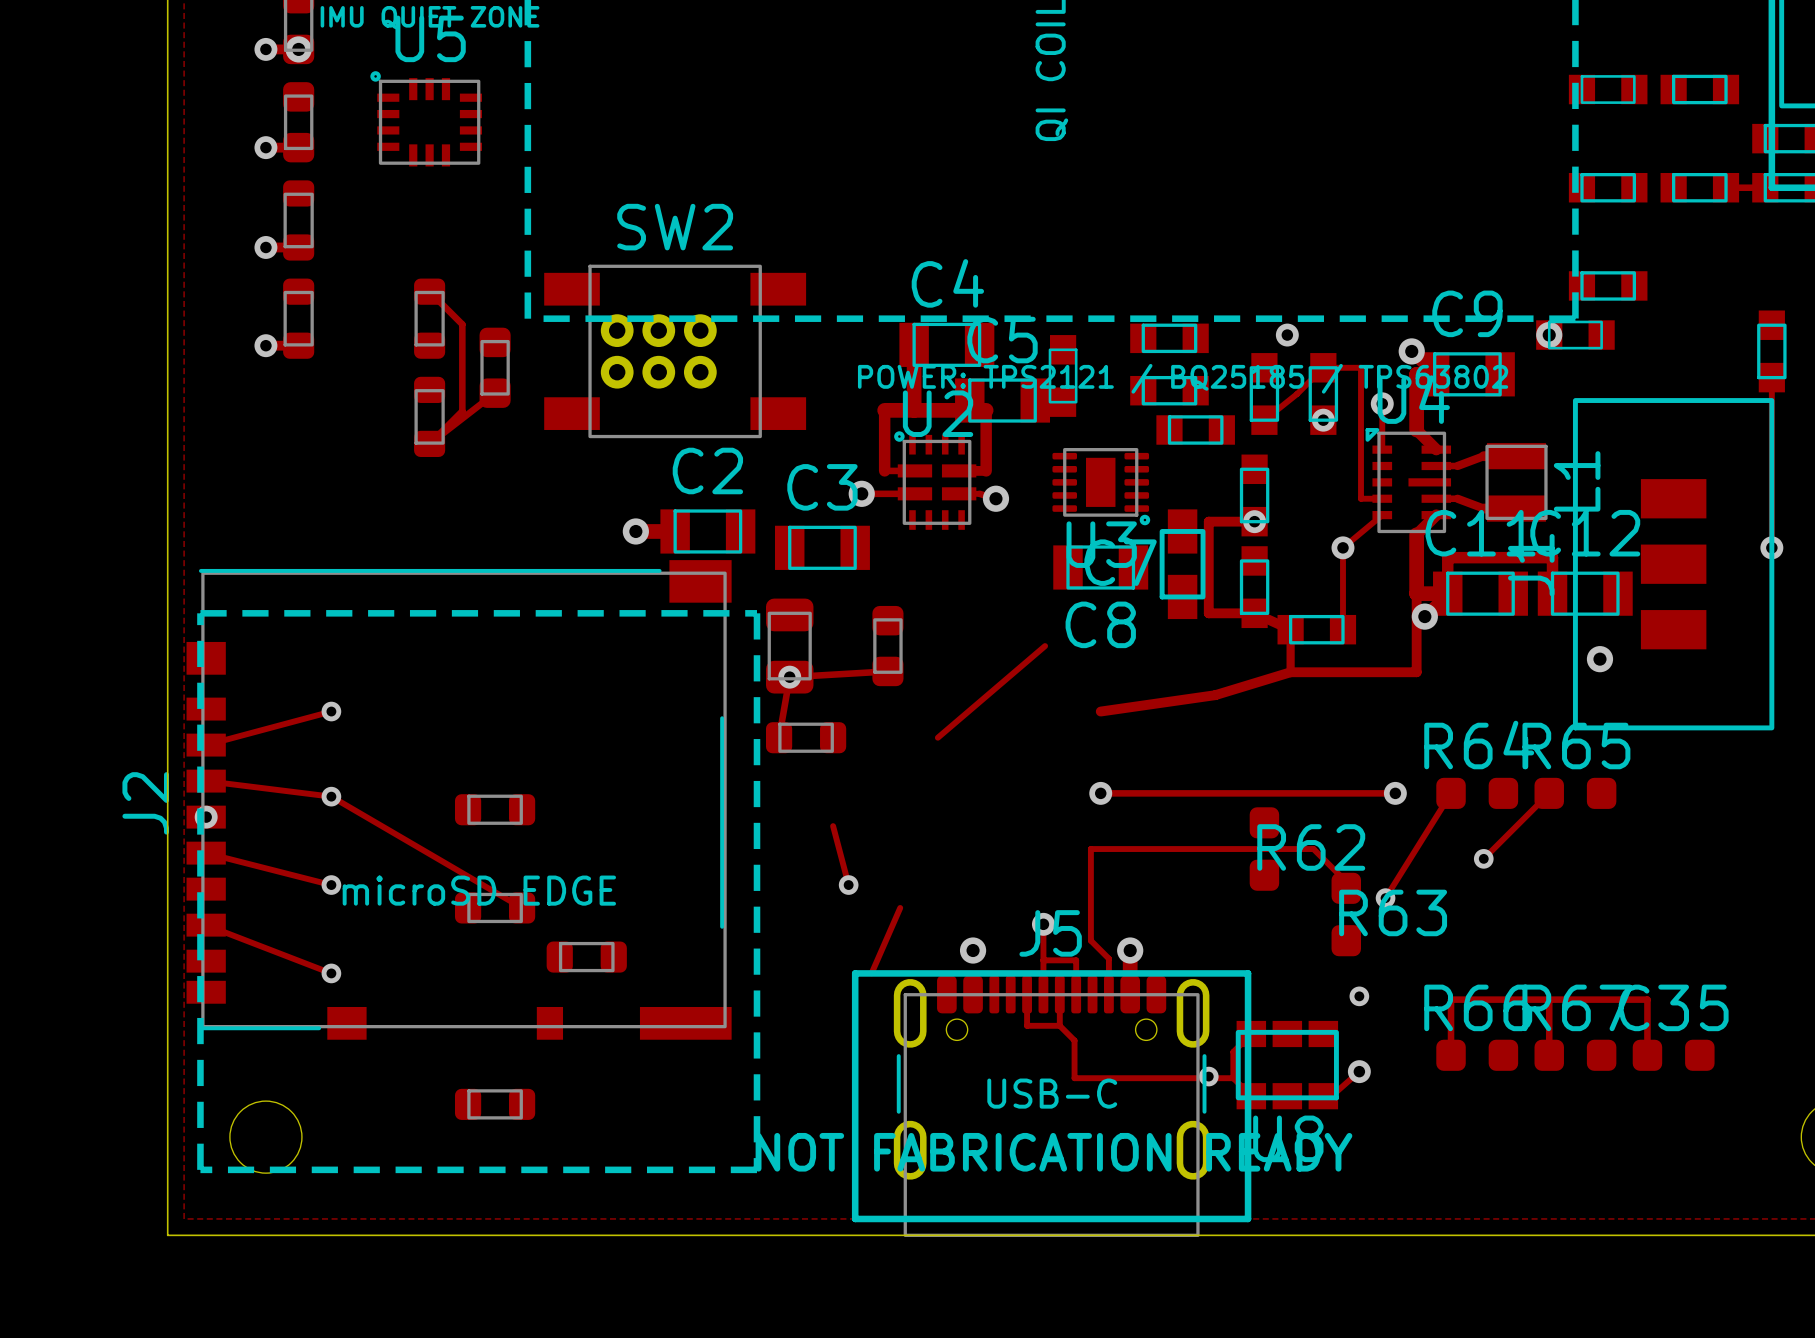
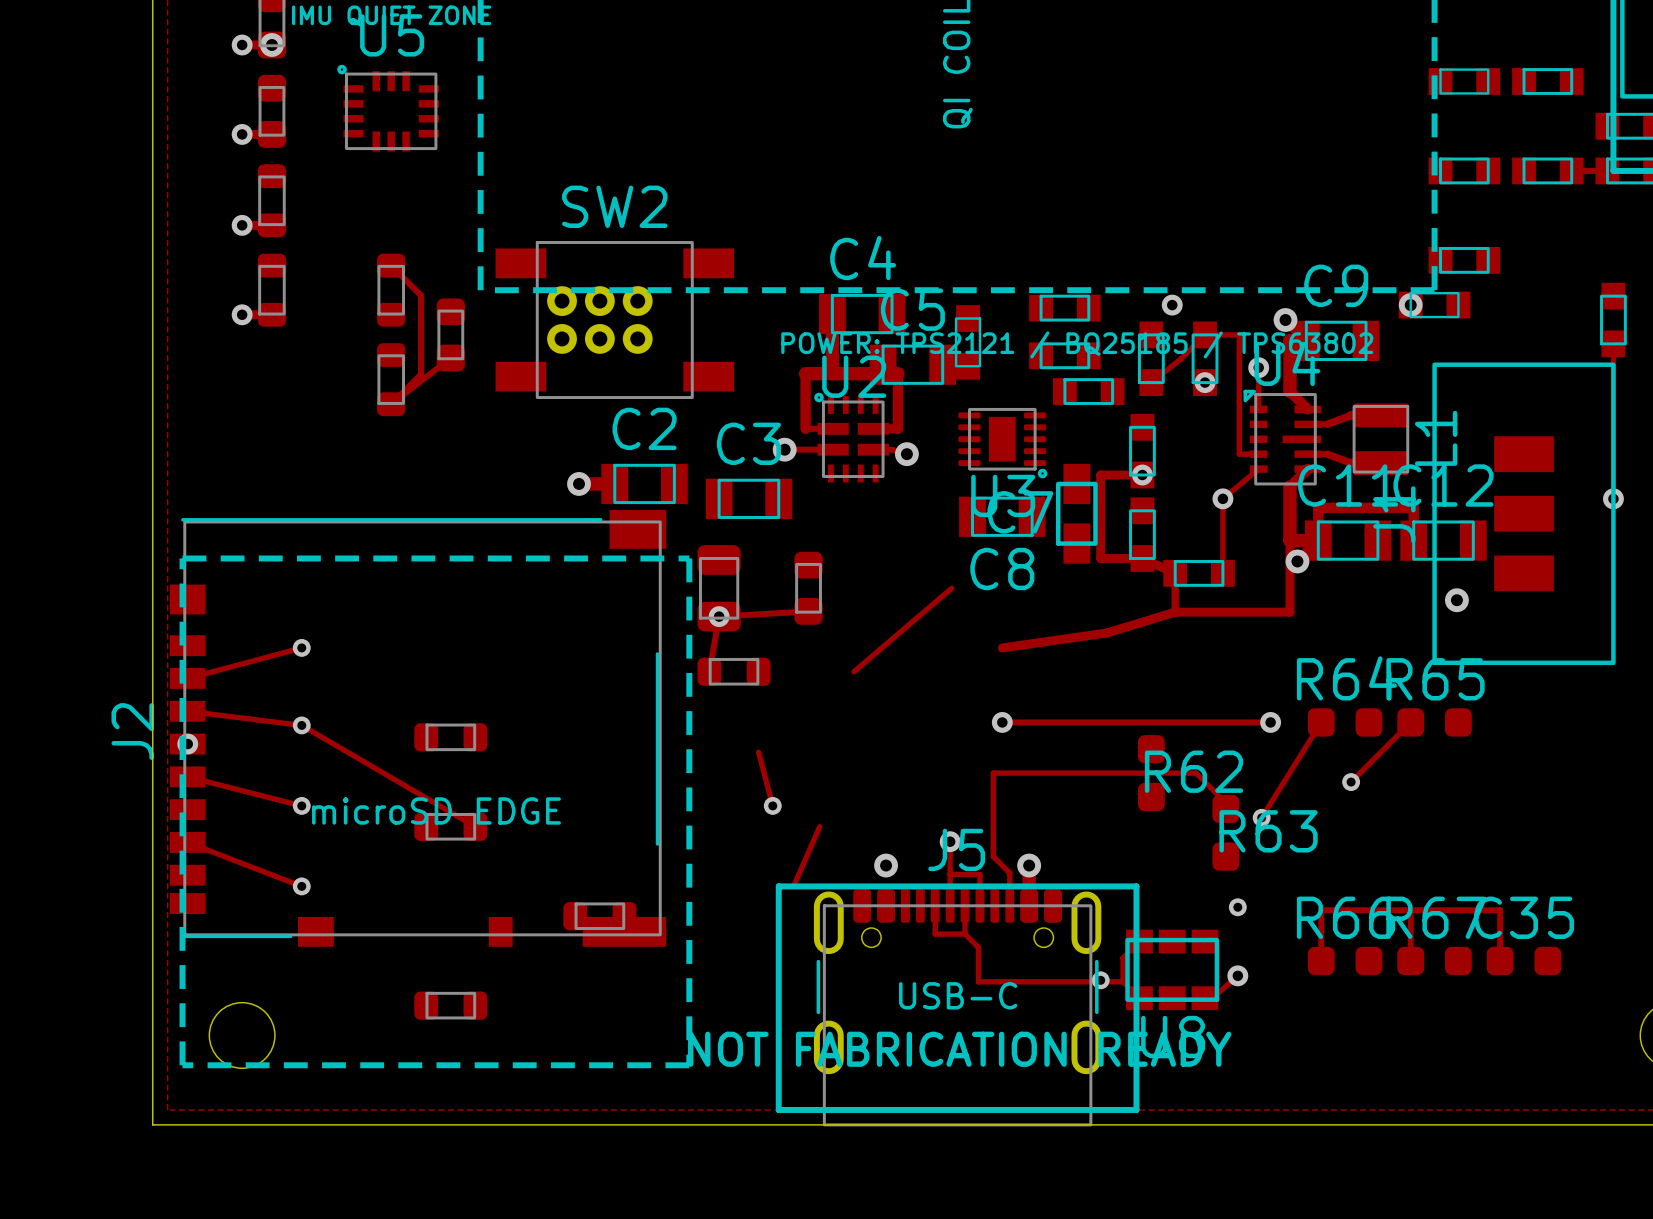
part position: (586, 957) -> (599, 916)

